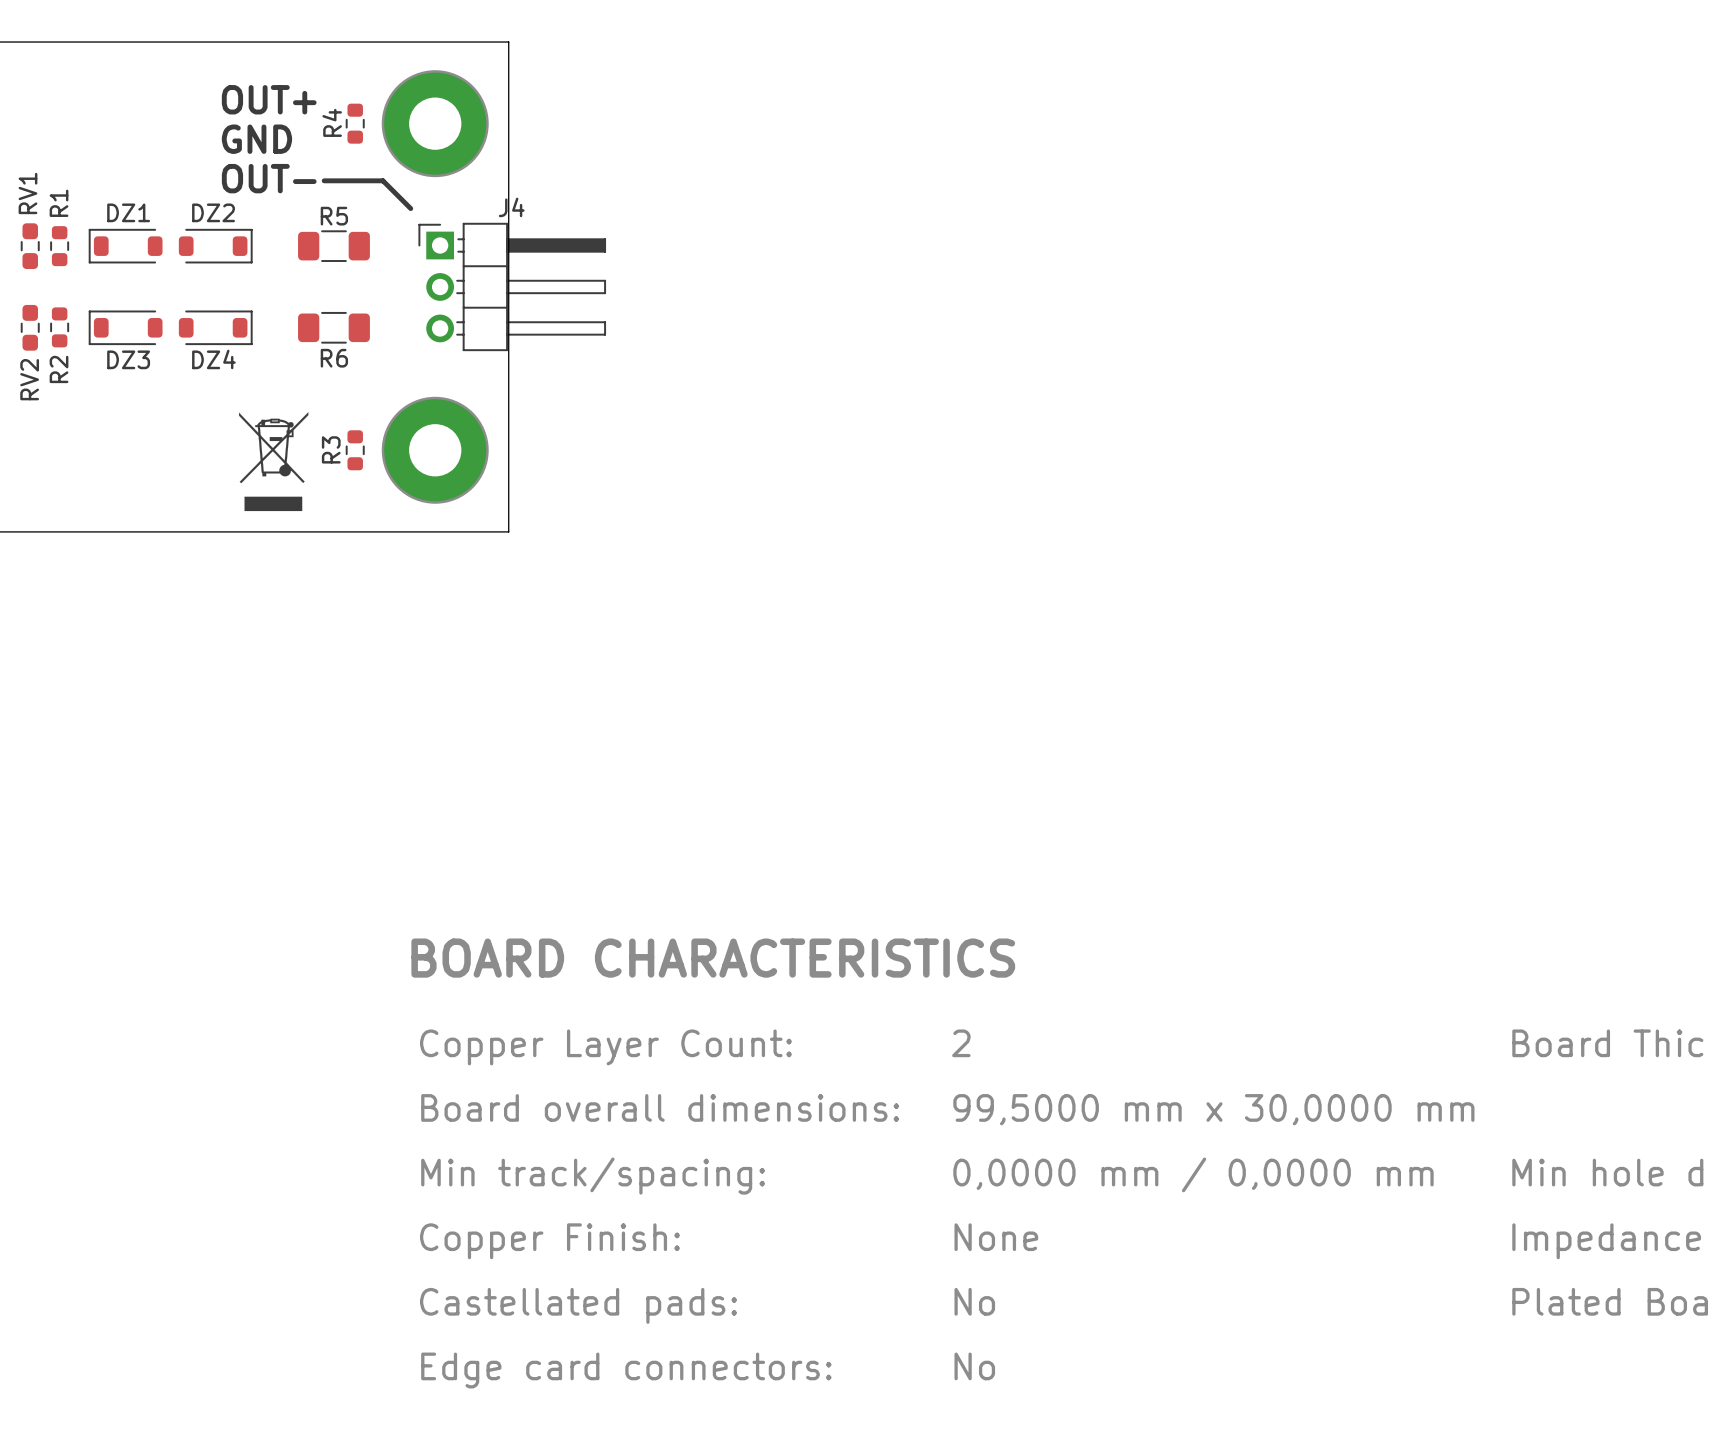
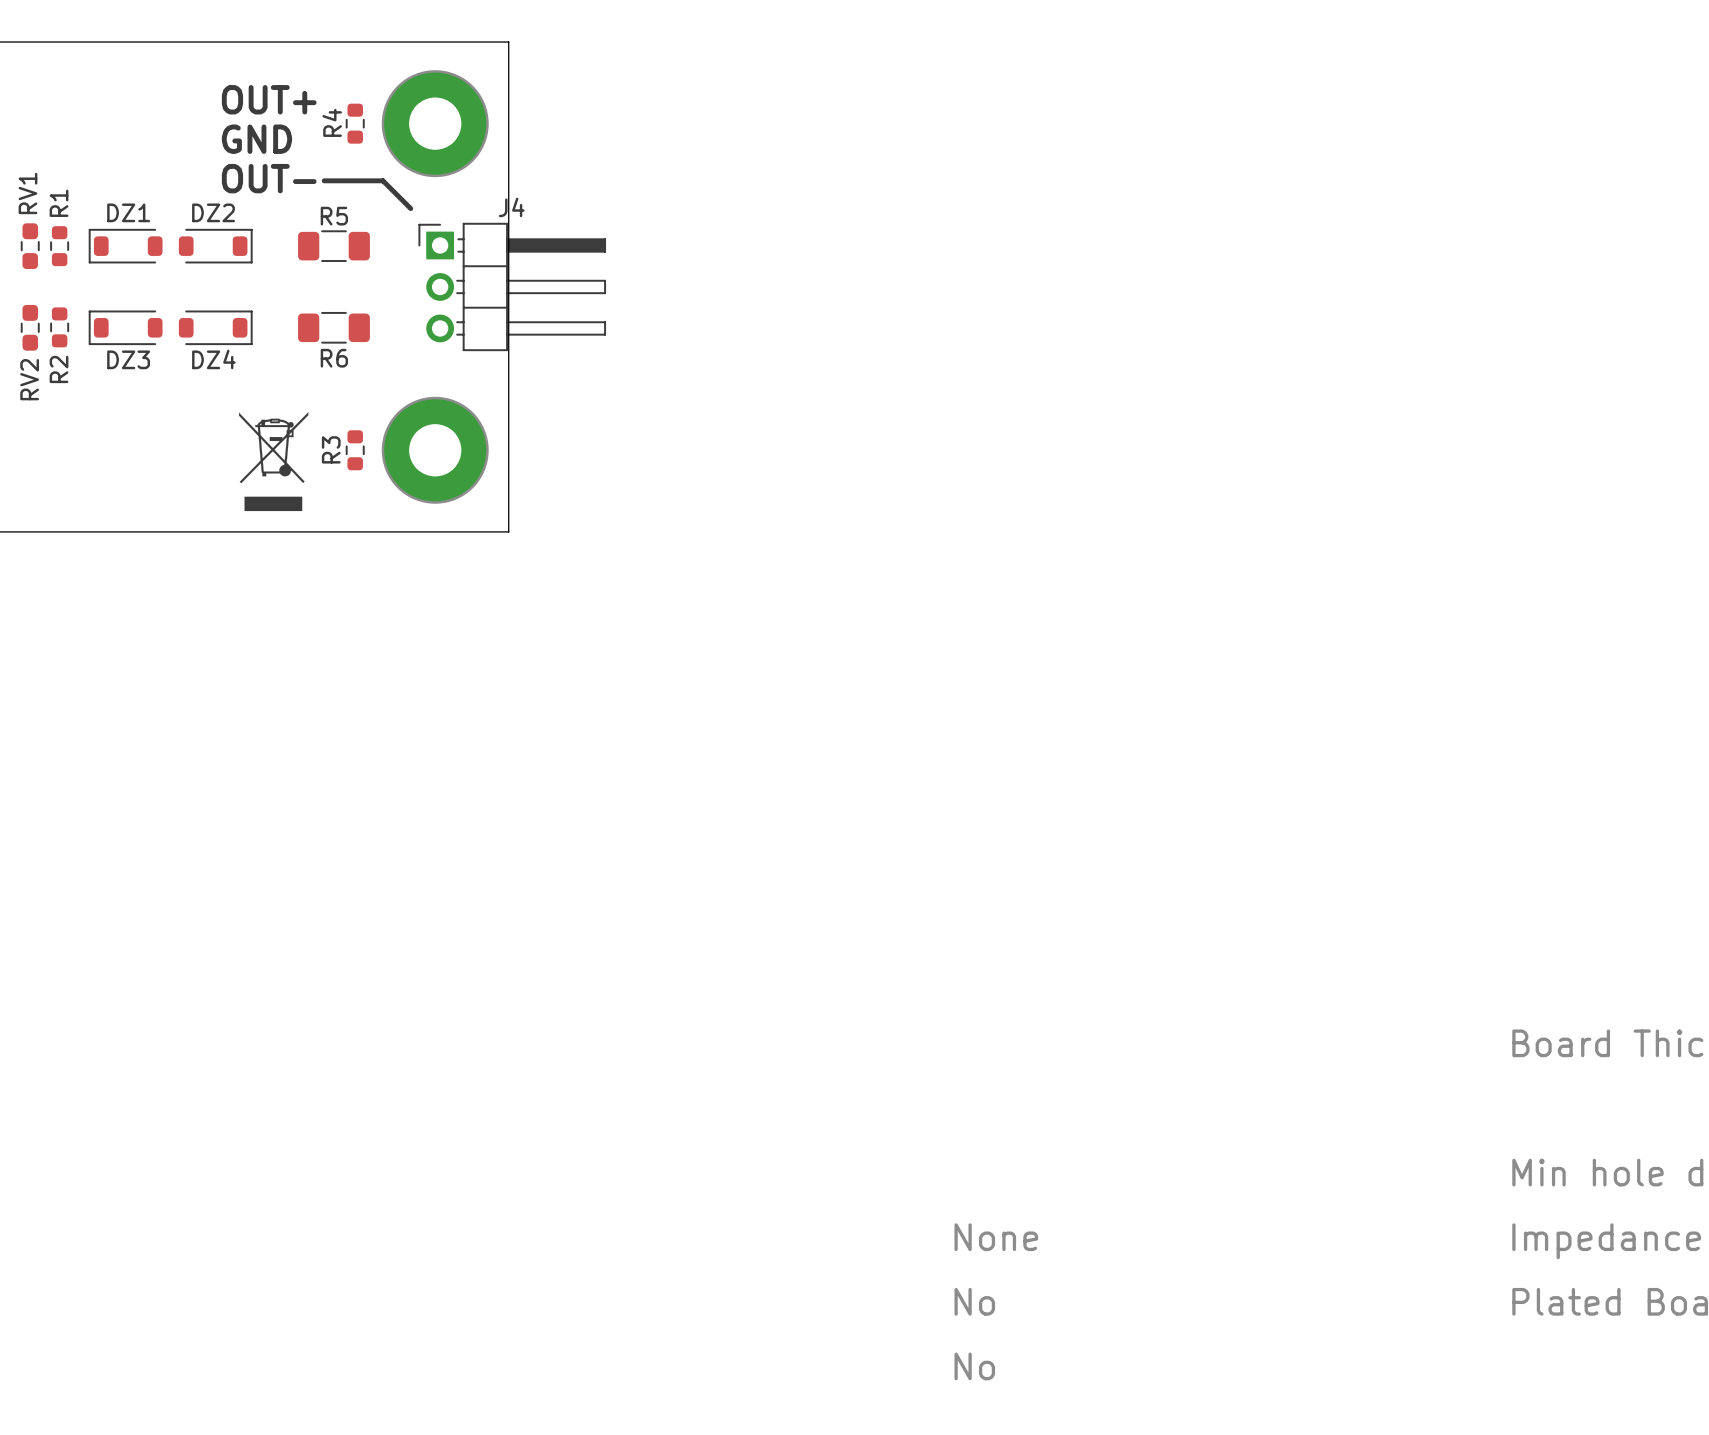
text: BOARD CHARACTERISTICS (713, 958) -> none
text: 2 (961, 1043) -> none
text: Copper Layer Count: (605, 1047) -> none
text: Board overall dimensions: (660, 1107) -> none
text: 99,5000 mm x 30,0000 mm (1213, 1109) -> none
text: 0,0000 mm / 0,0000 mm (1193, 1174) -> none
text: Min track/spacing: (593, 1176) -> none
text: Copper Finish: (549, 1241) -> none
text: Castellated pads: (578, 1305) -> none
text: Edge card connectors: (626, 1370) -> none

